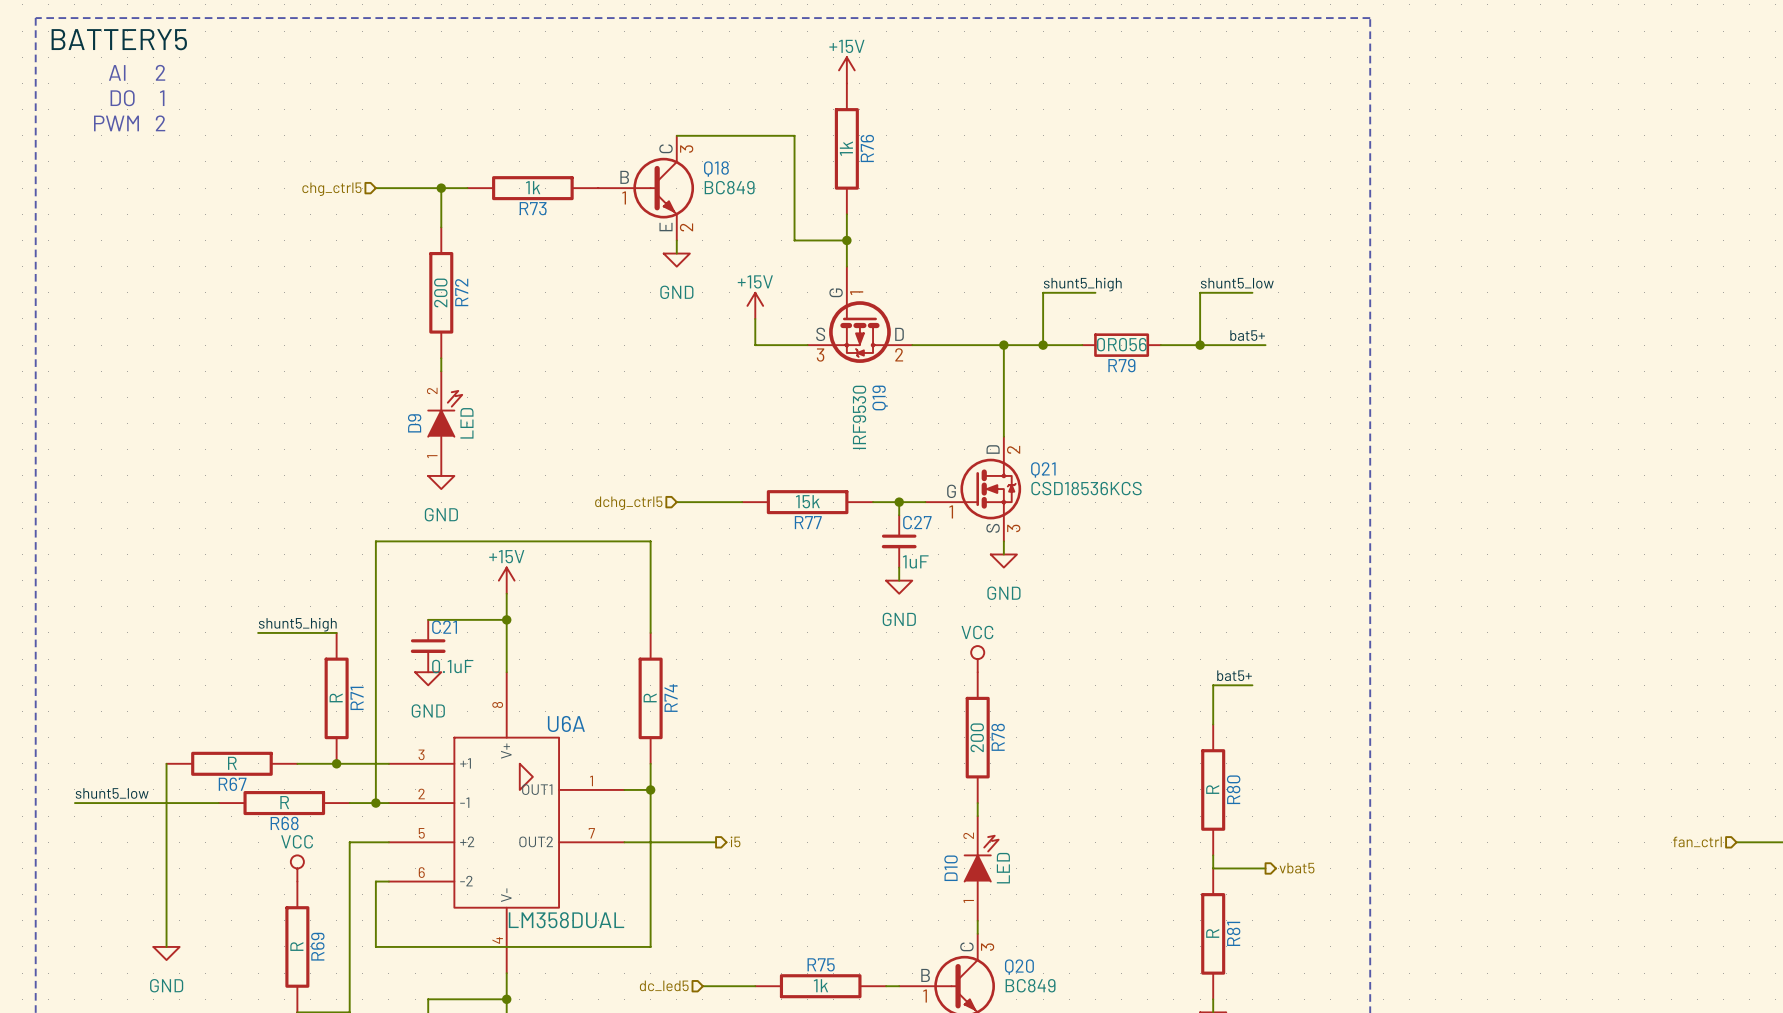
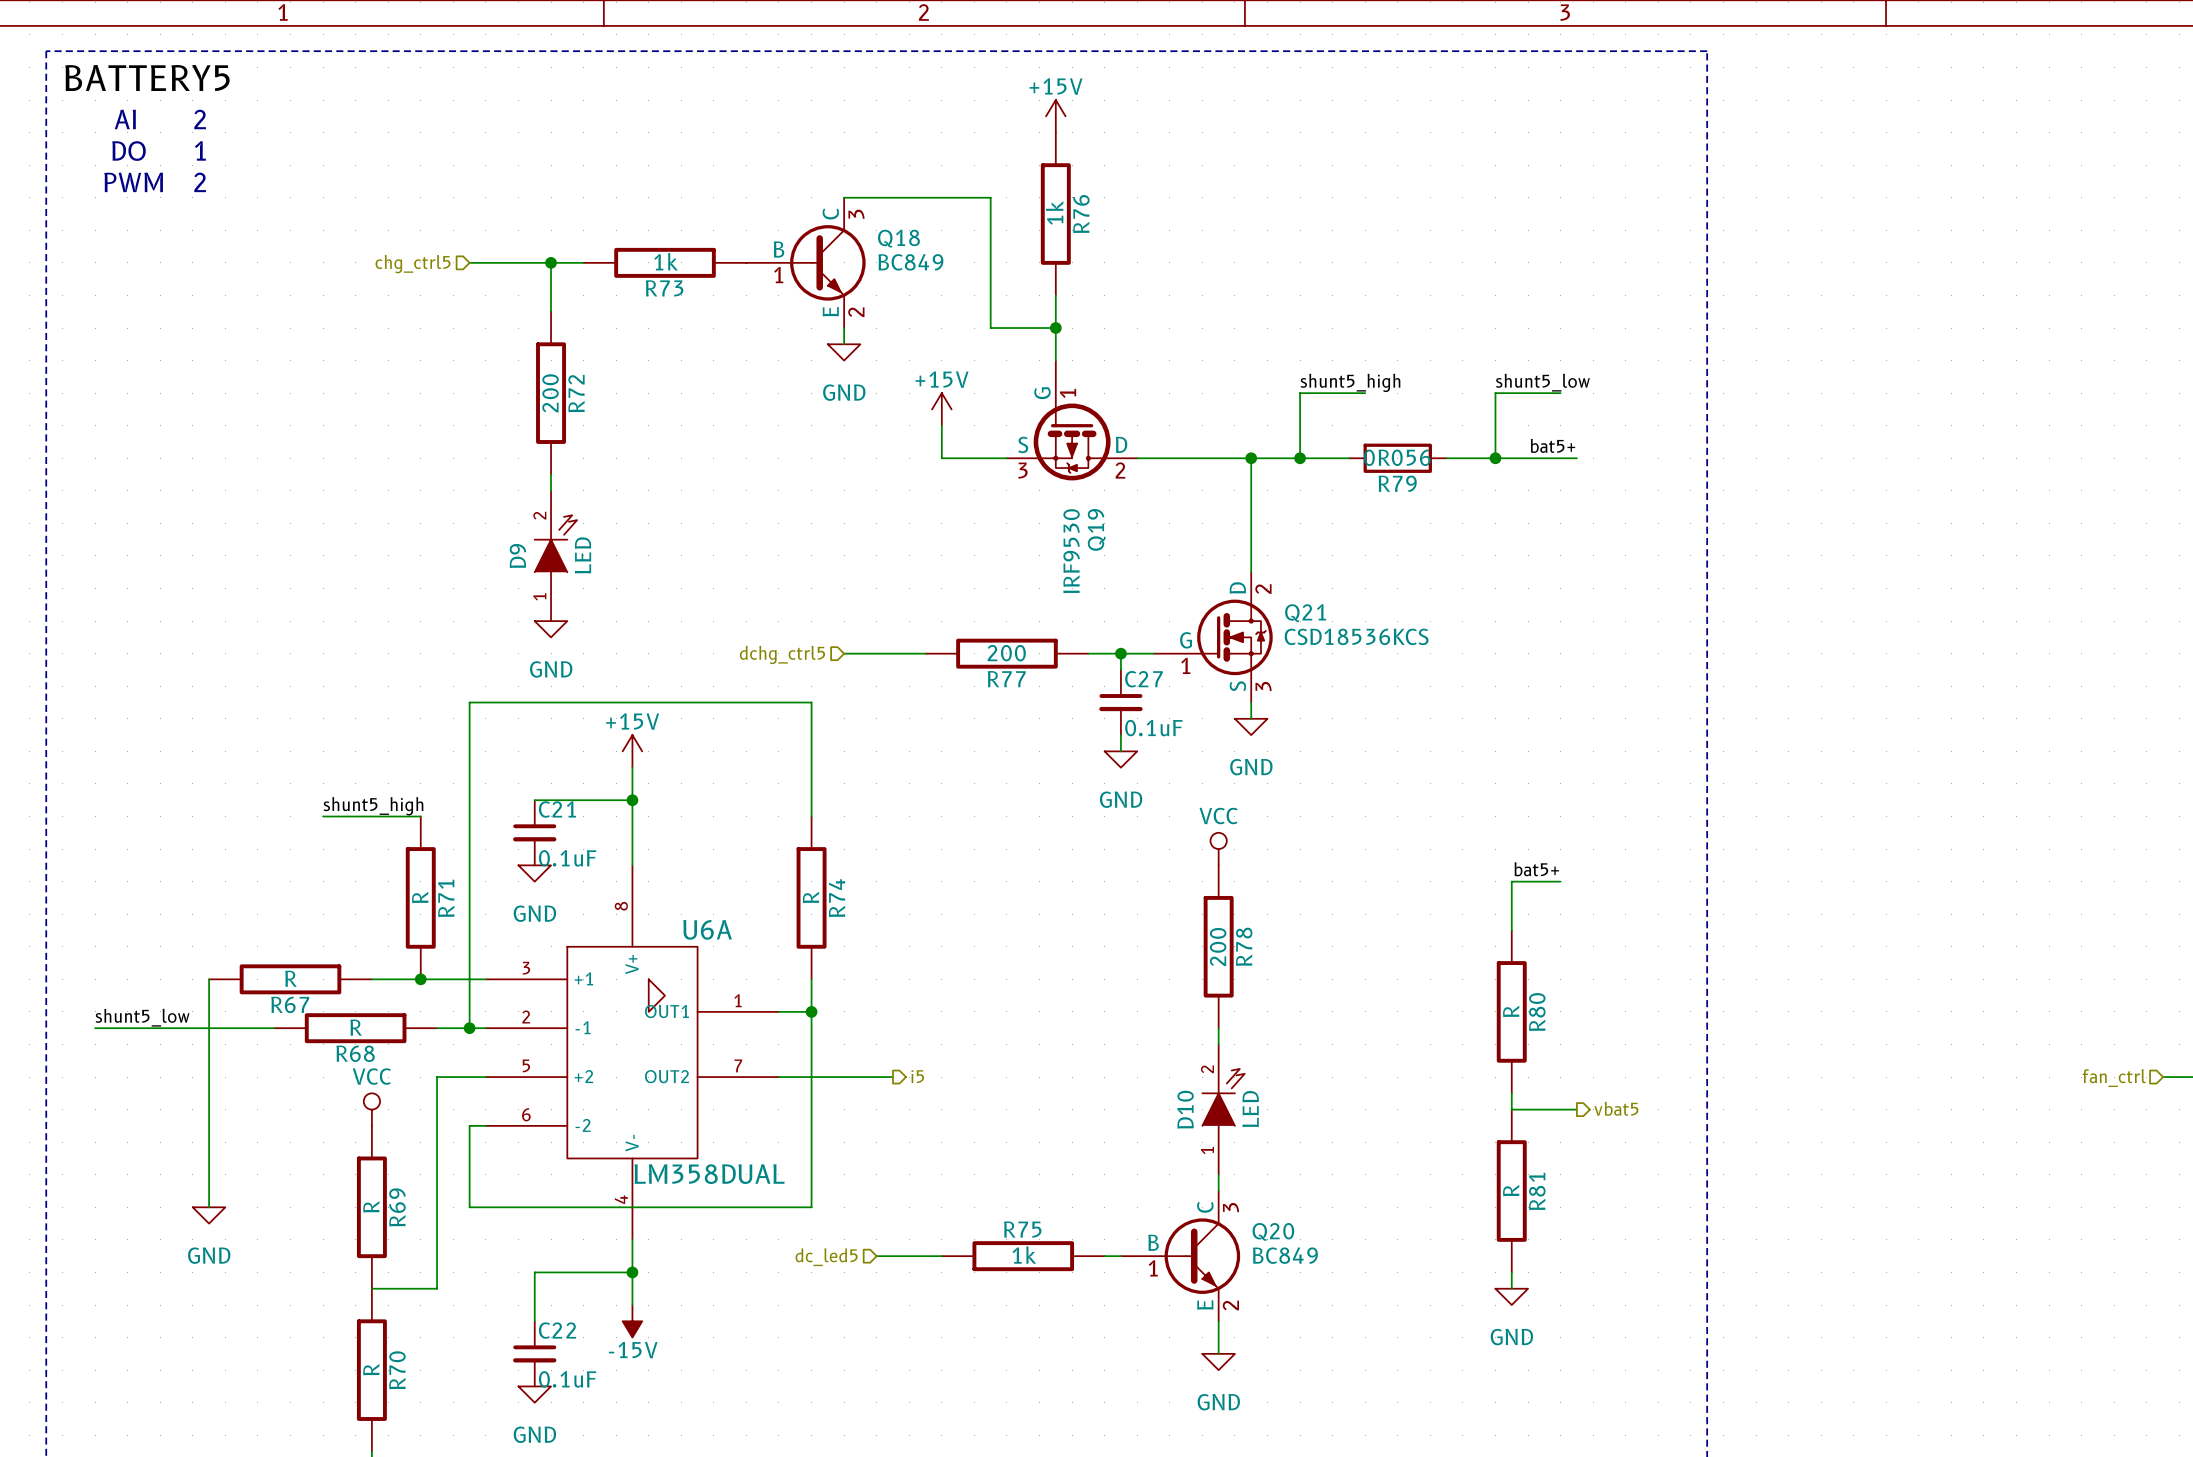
R77 value: 15k (807, 501) -> 200 (1006, 653)
C27 value: 1uF (915, 561) -> 0.1uF (1153, 728)

